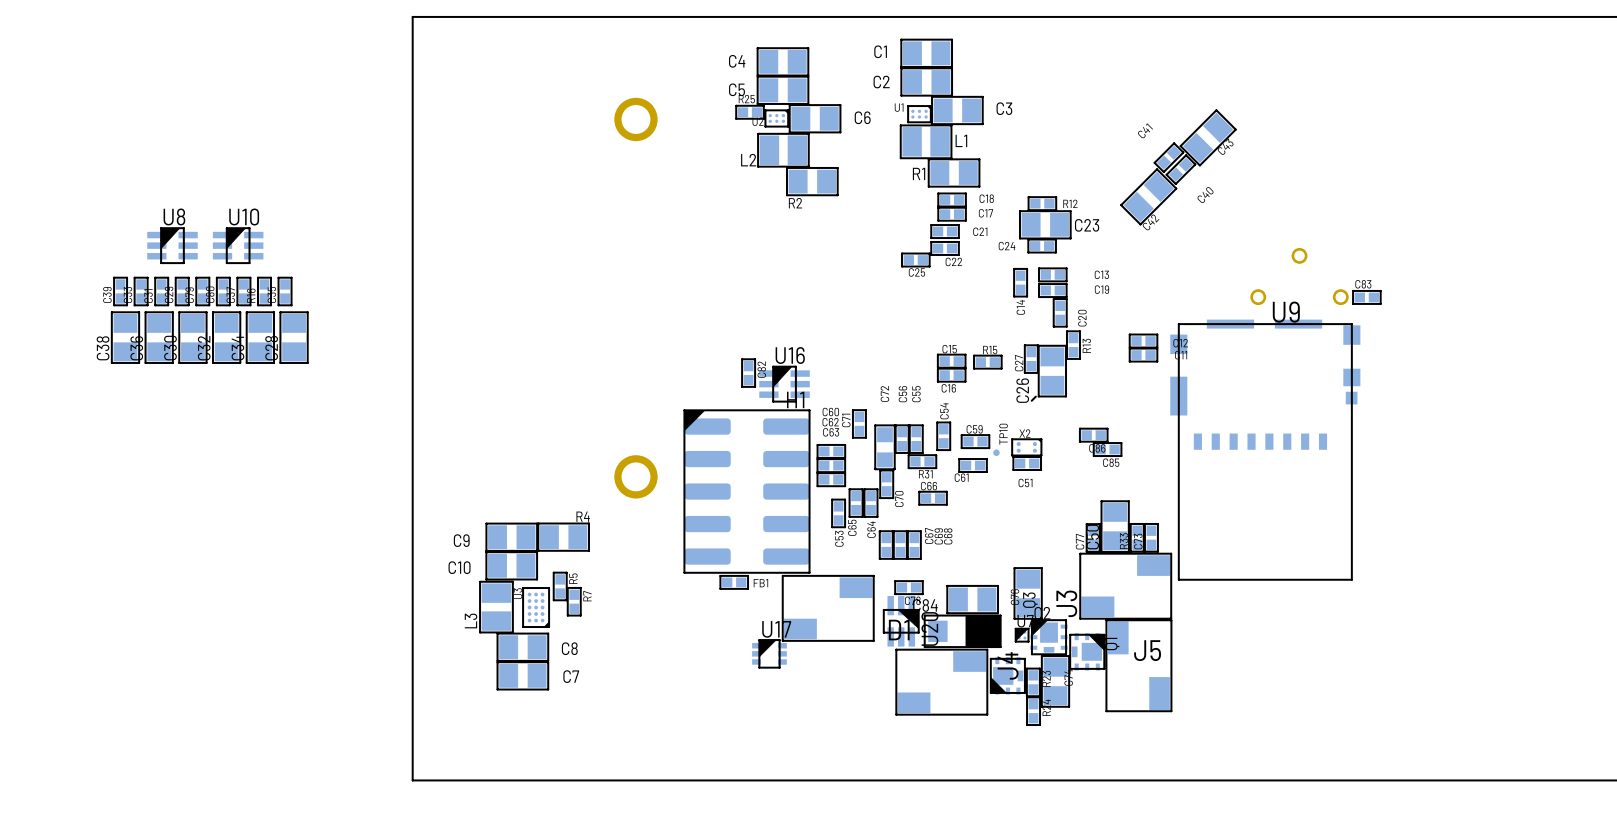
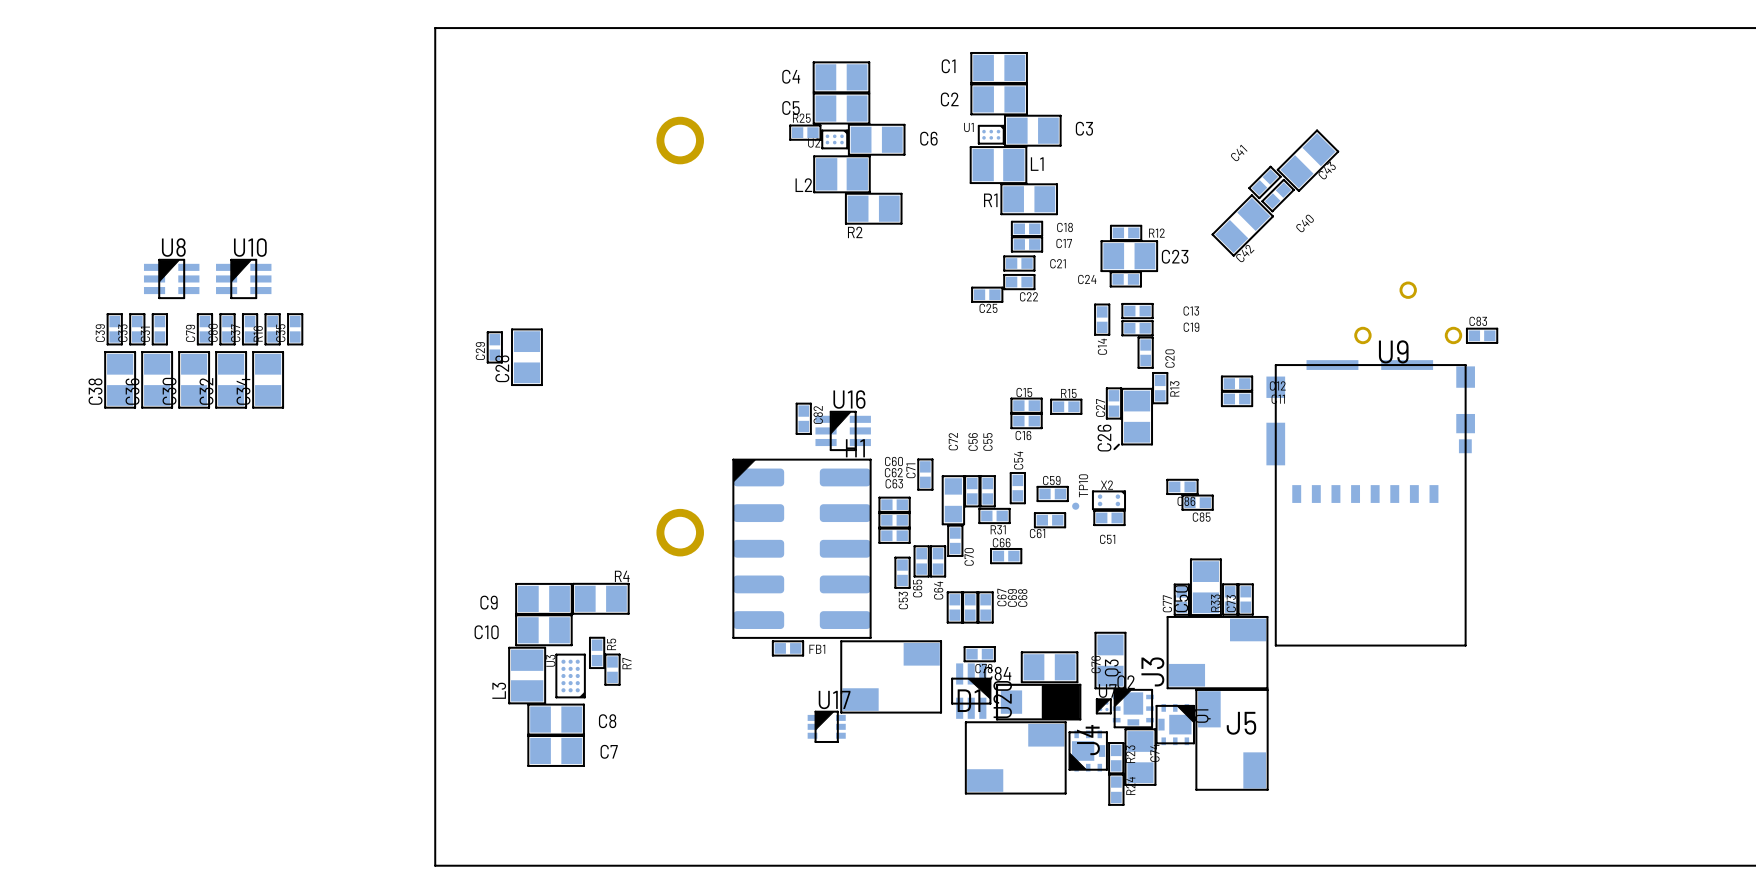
C29 position: (182, 291) -> (494, 347)
C28 position: (294, 337) -> (526, 357)

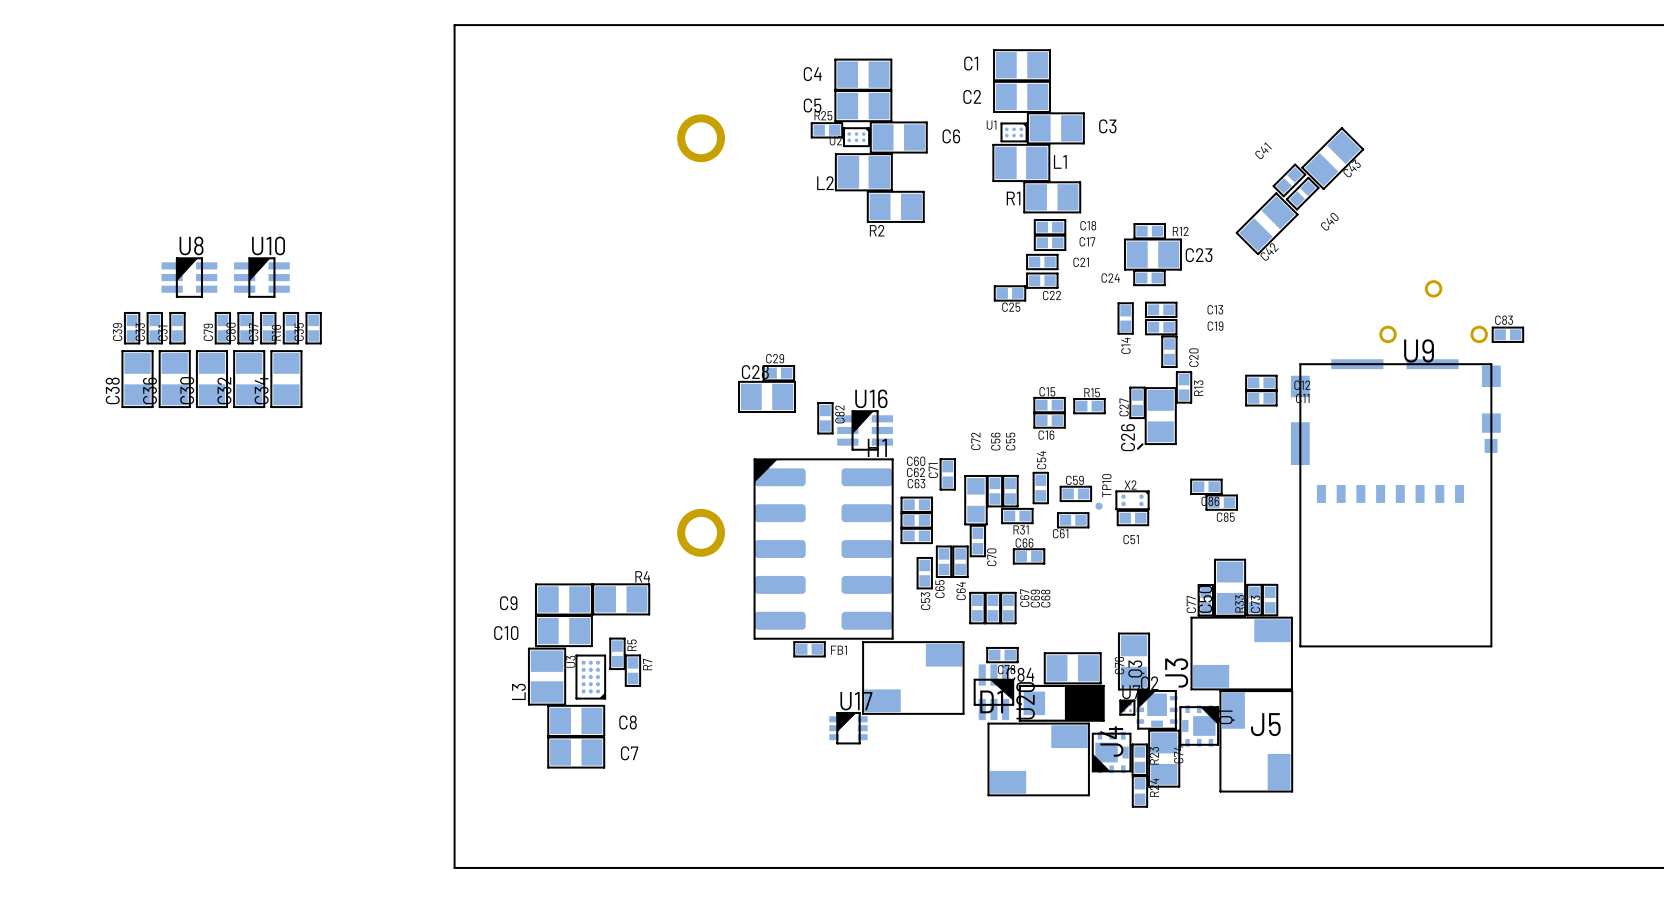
C29 rotation: 0° (494, 347) -> 90° clockwise (778, 373)
C29 position: (494, 347) -> (778, 373)
C28 rotation: 0° (526, 357) -> 90° clockwise (766, 396)
C28 position: (526, 357) -> (766, 396)

